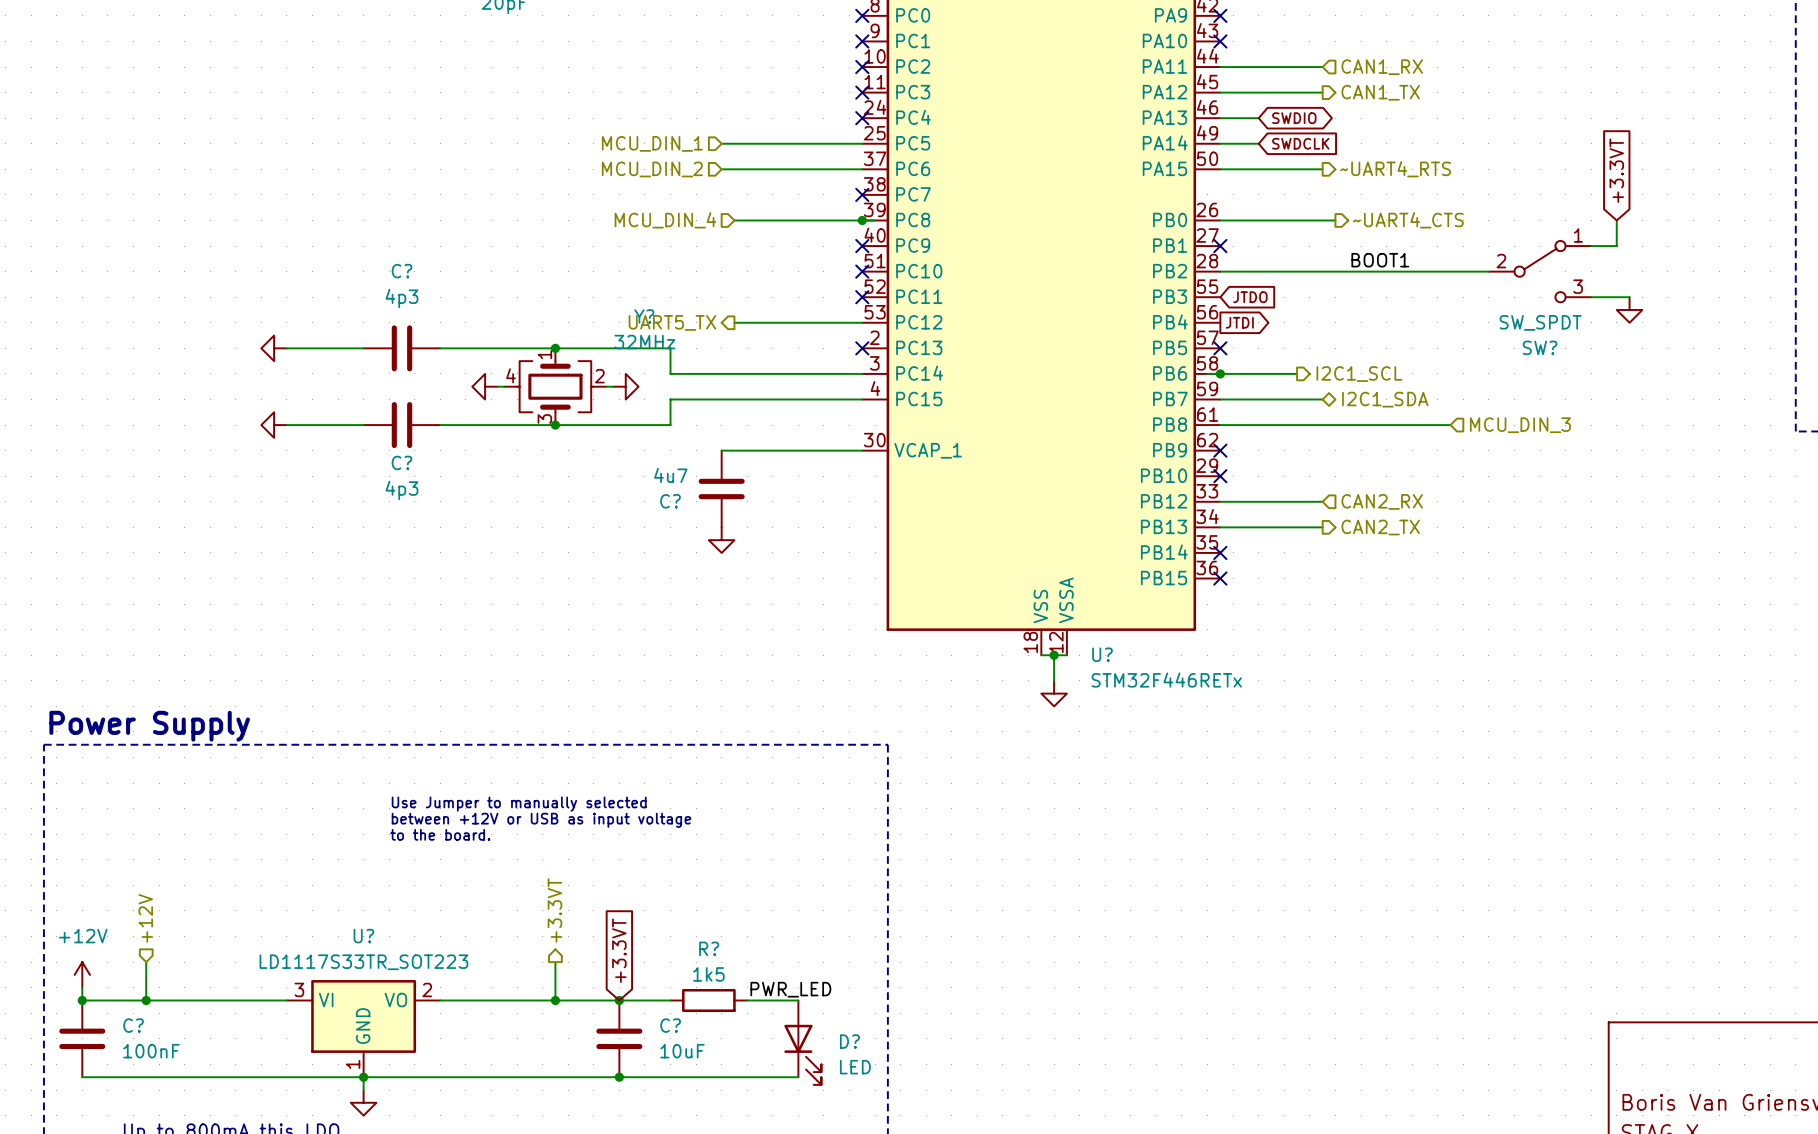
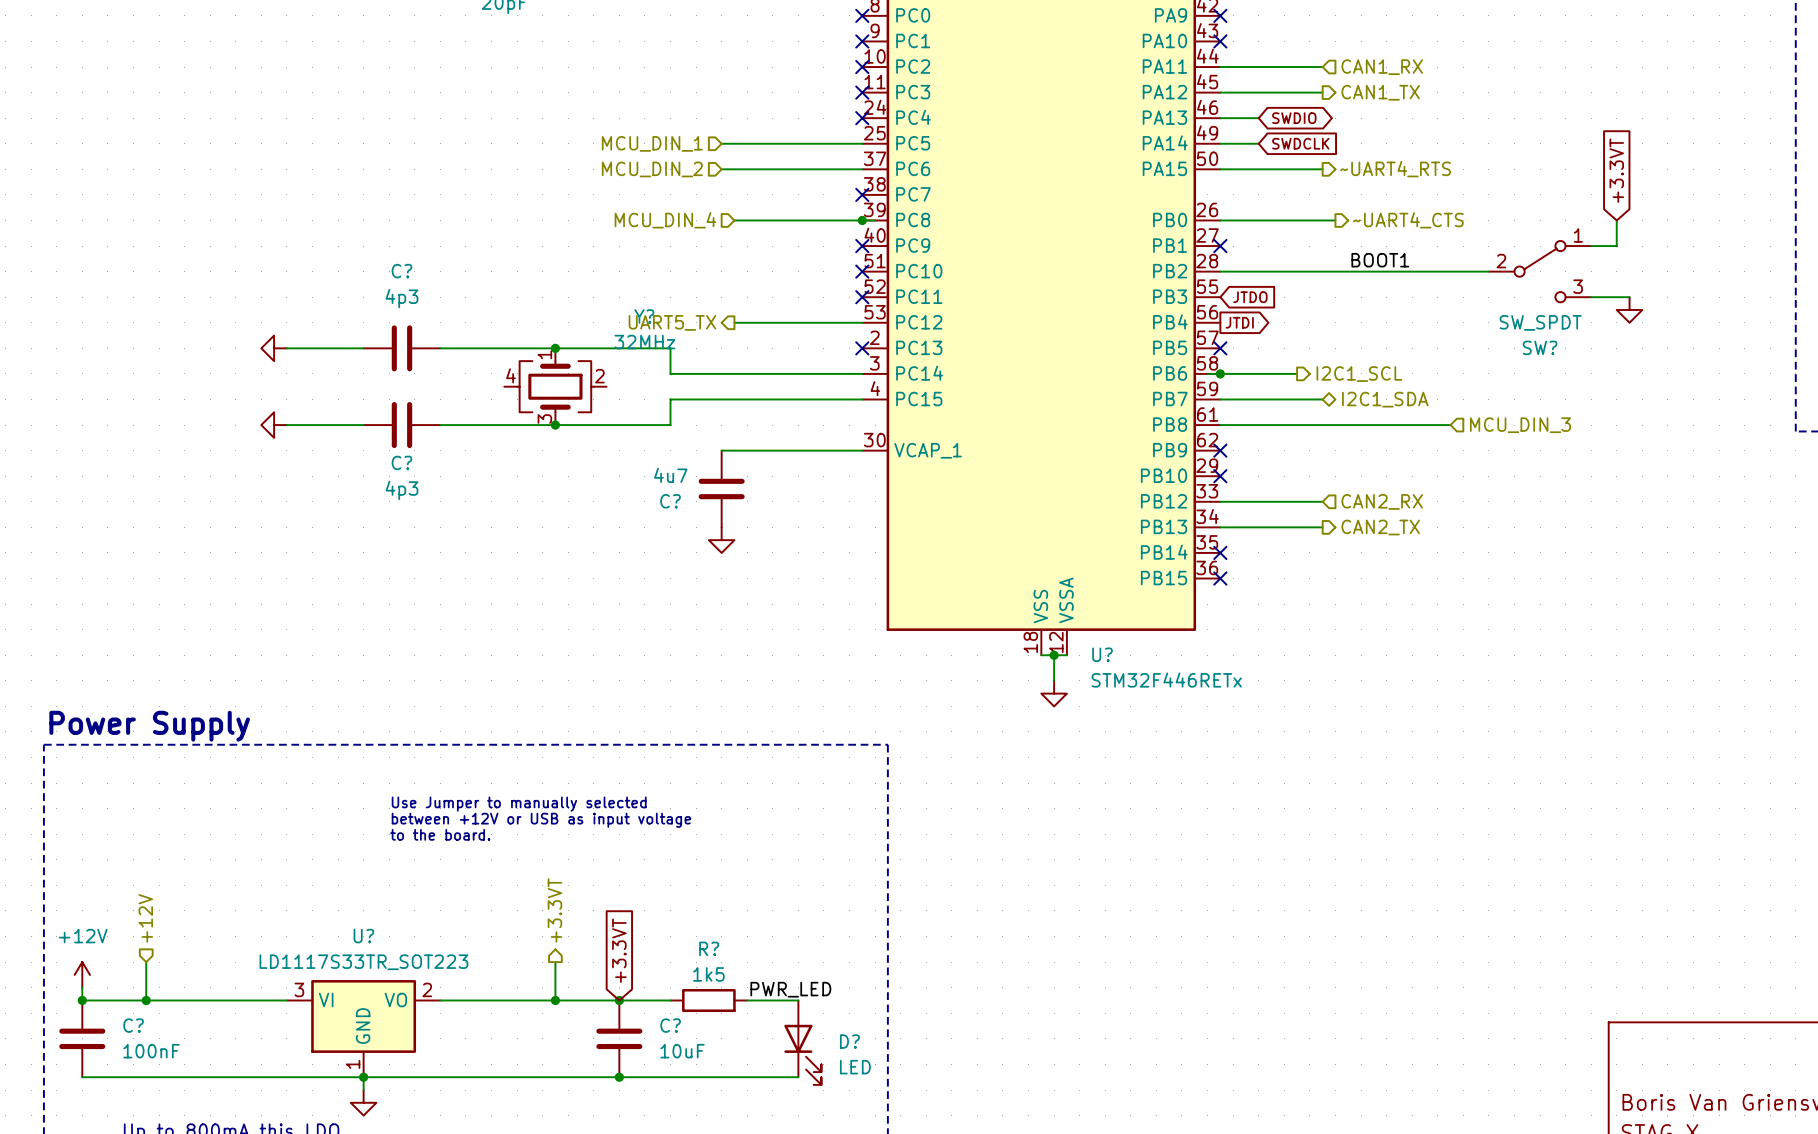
power symbol: (485, 386) -> none
wire: (497, 386) (504, 386) -> none
wire: (606, 386) (612, 386) -> none
power symbol: (625, 386) -> none

